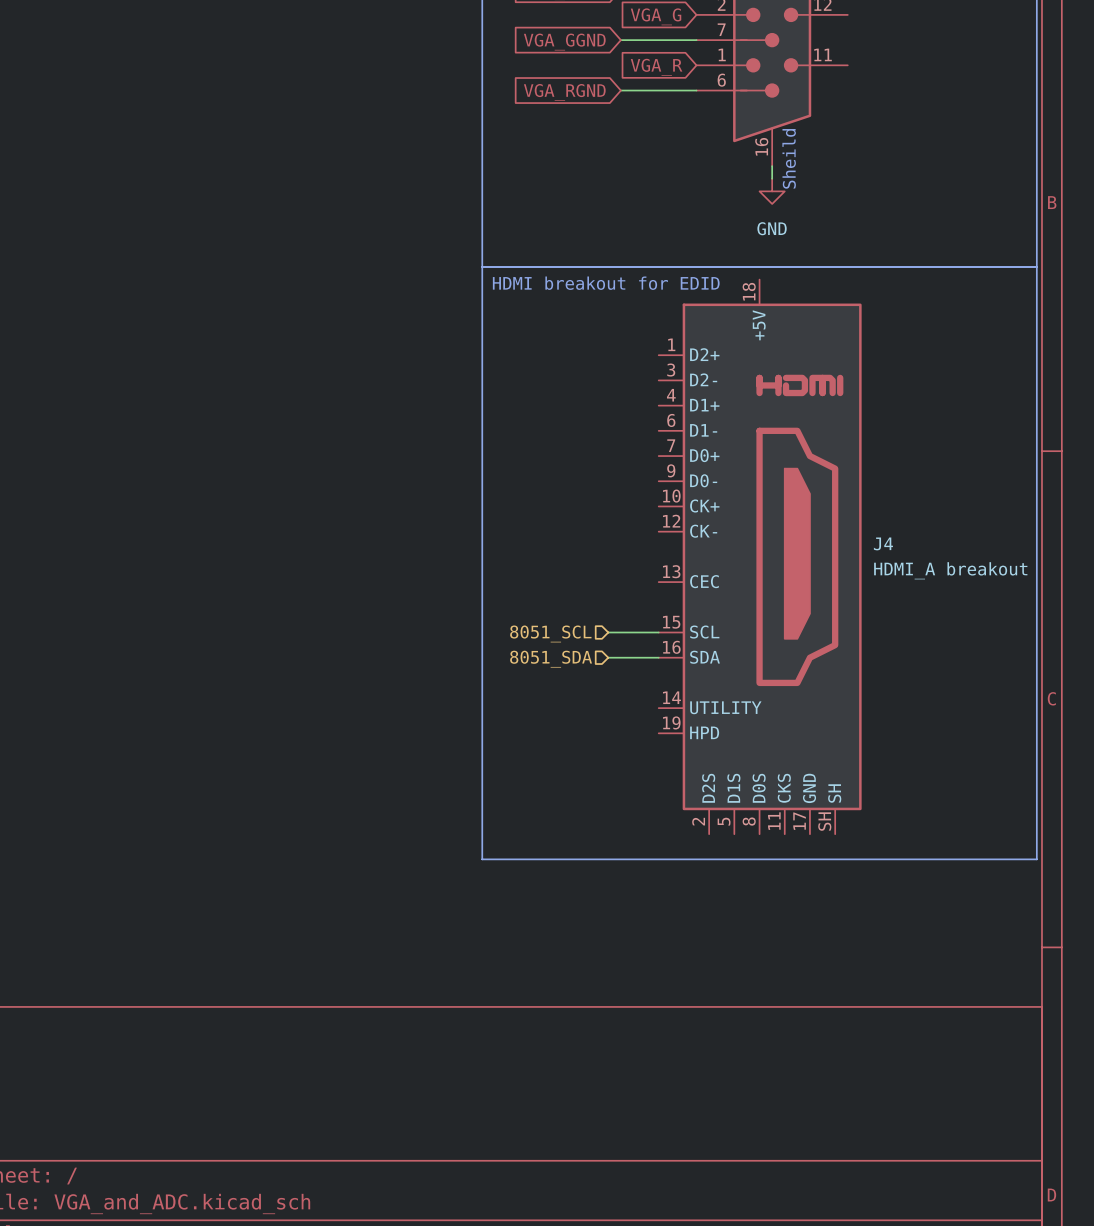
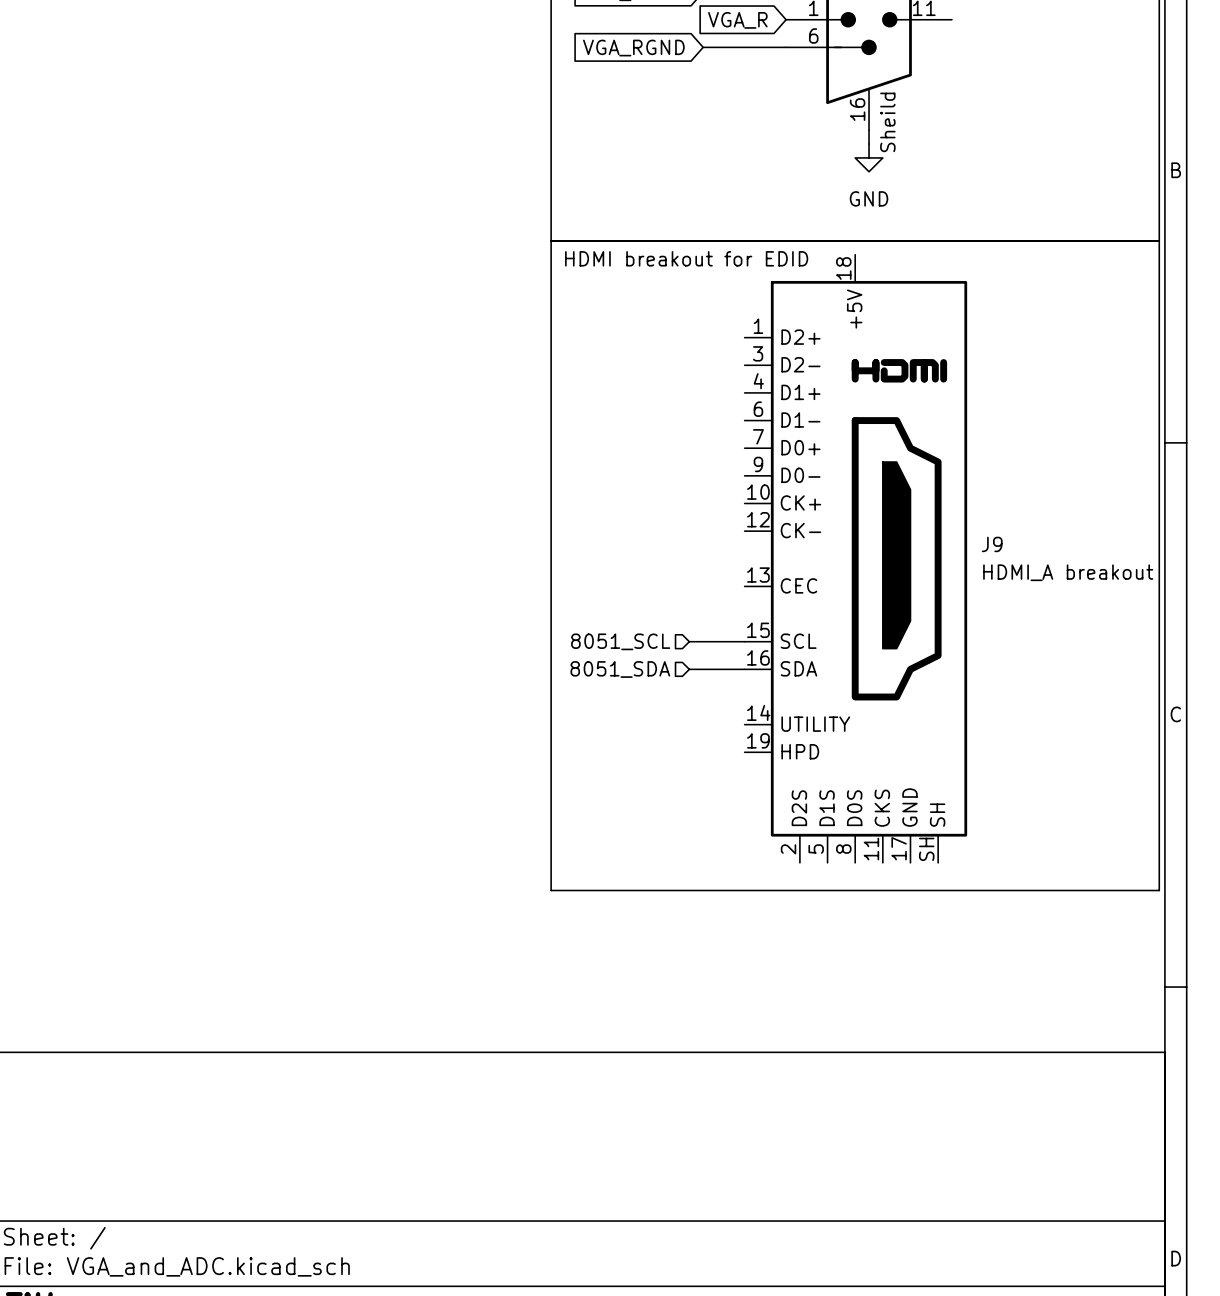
J4 name: J4 (883, 543) -> J9 (992, 544)

